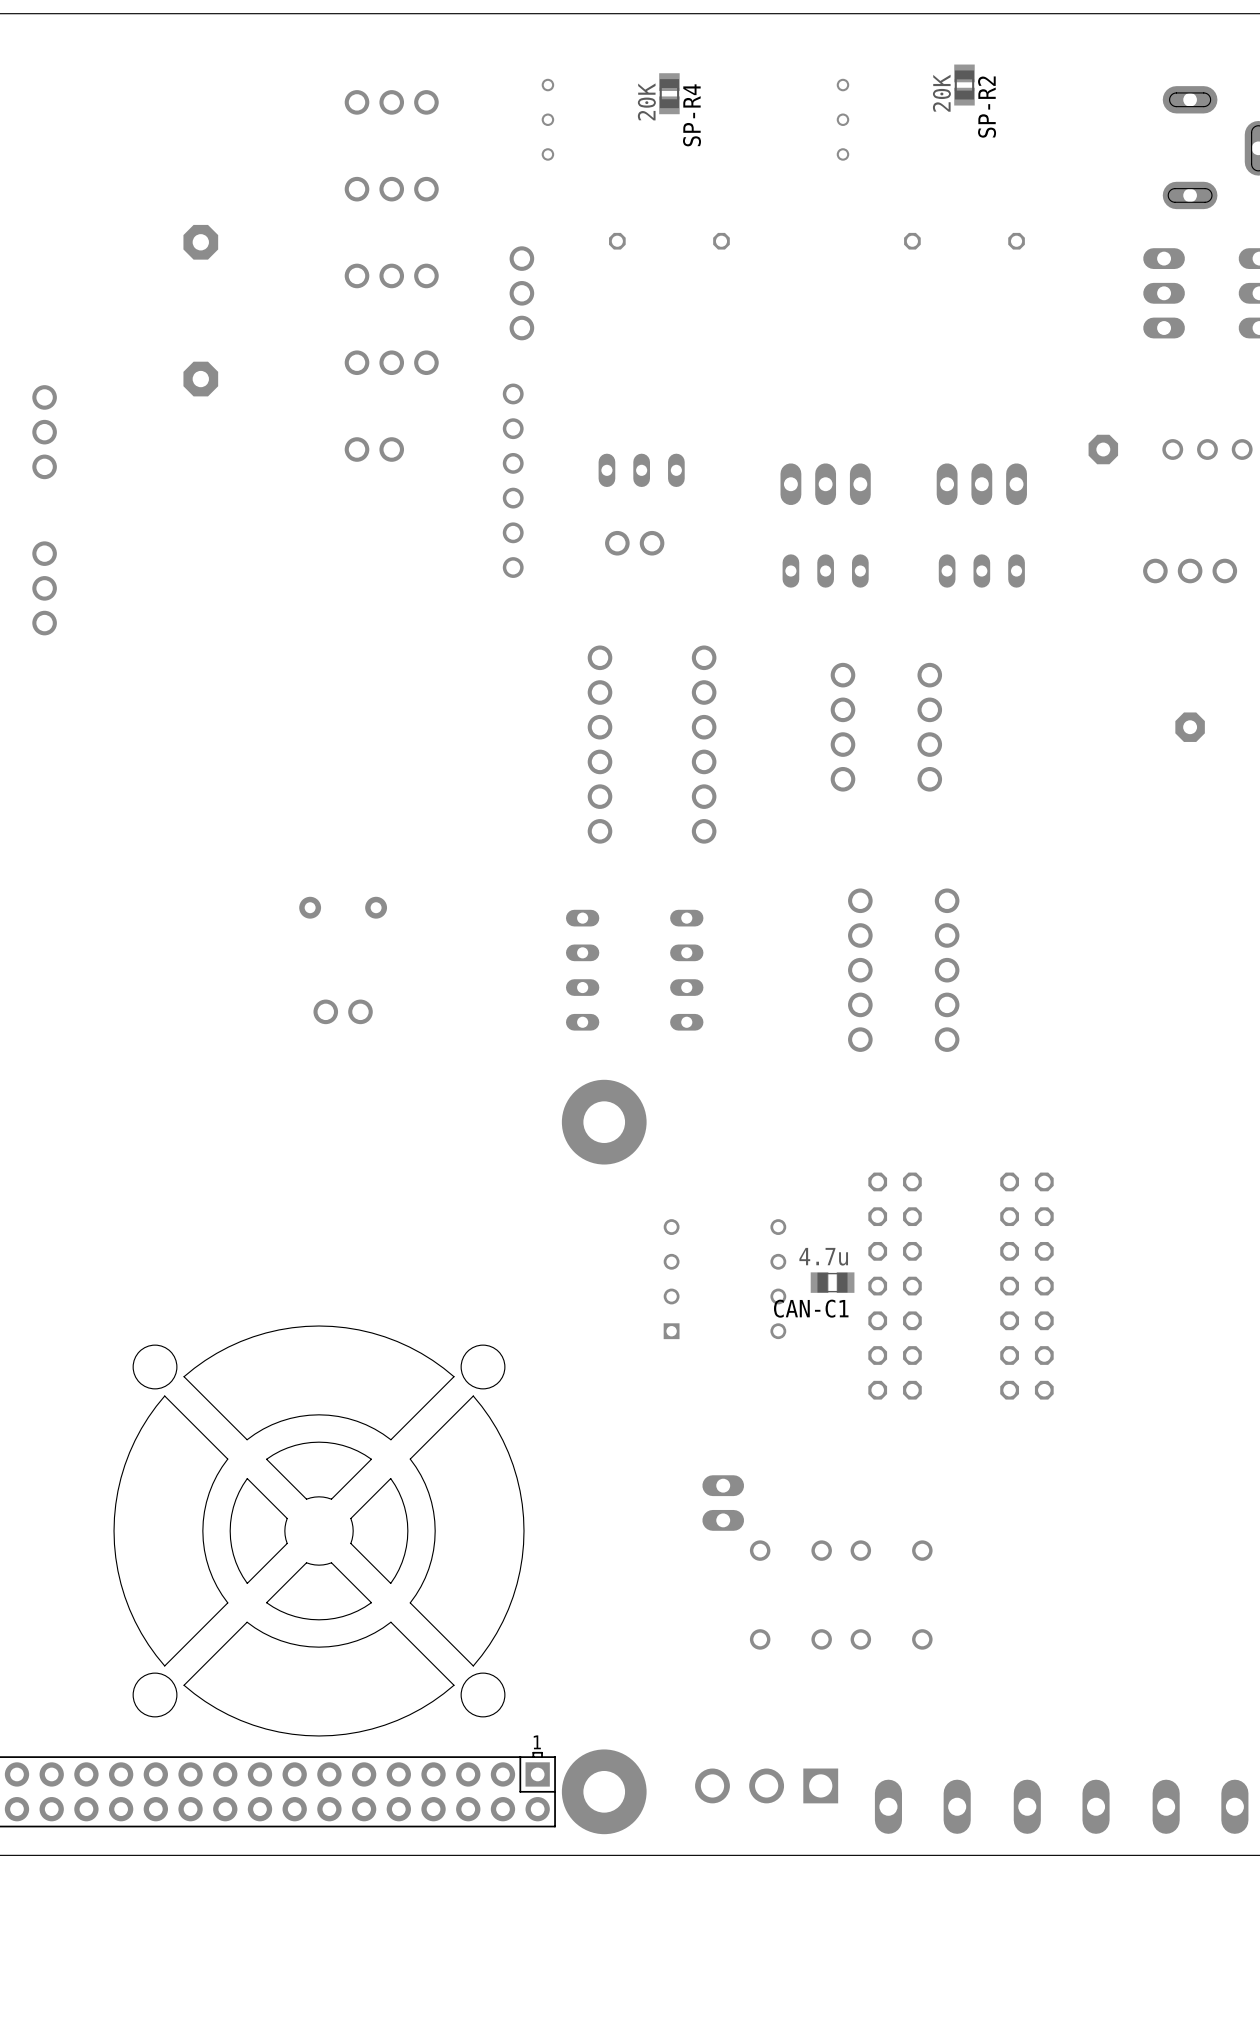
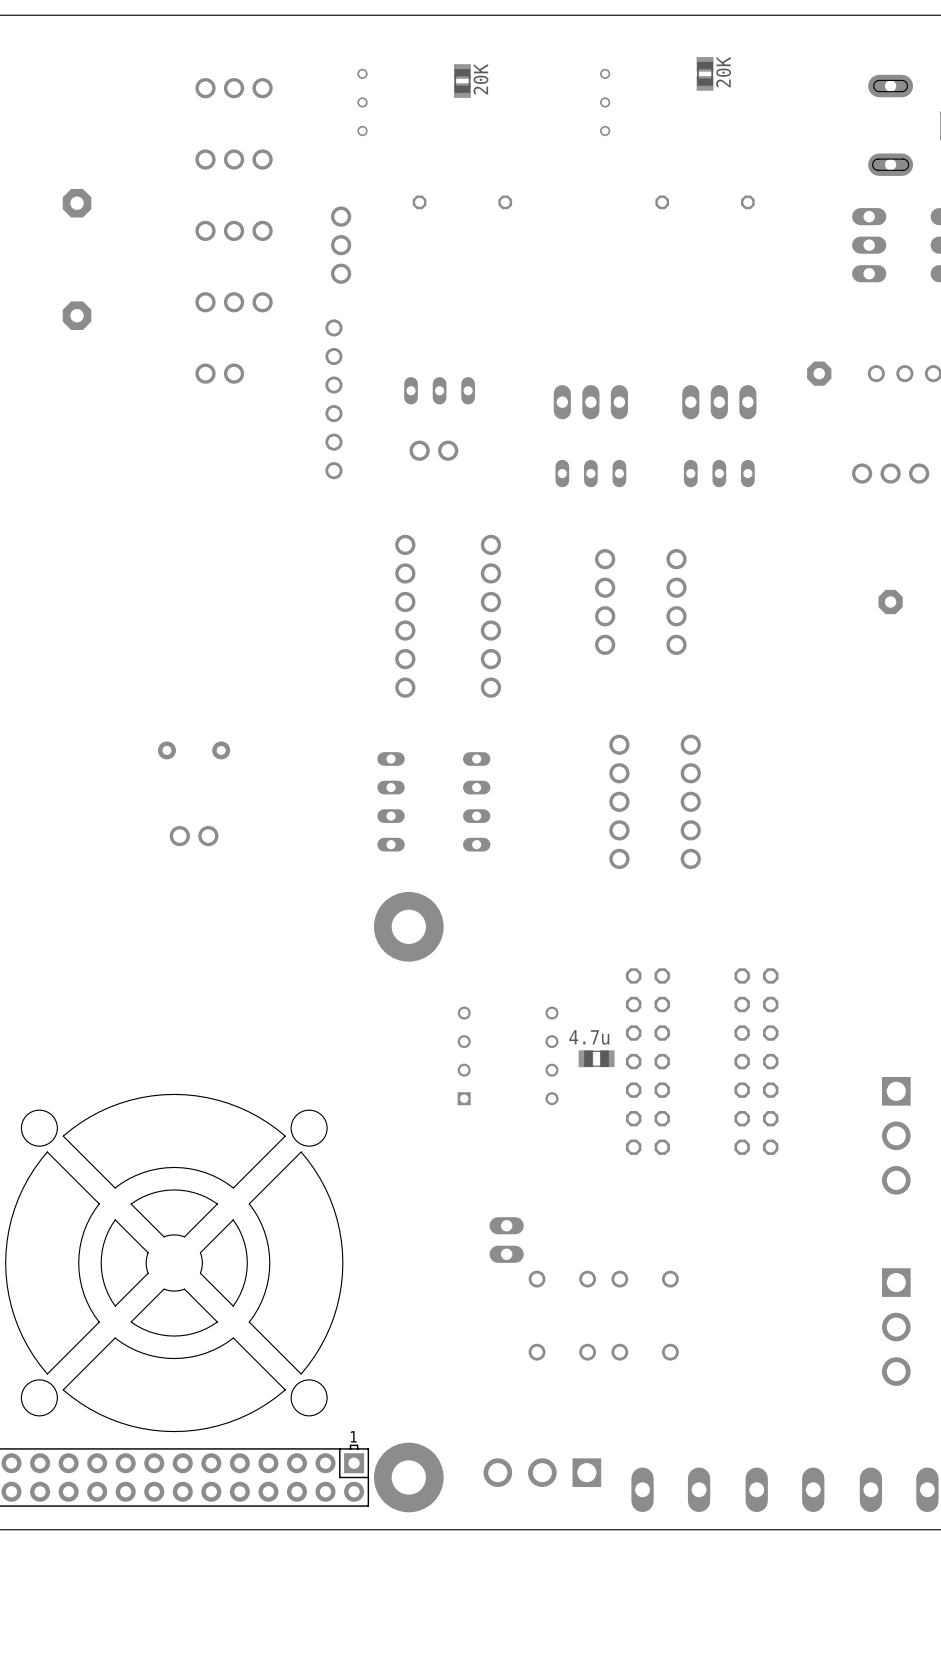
SP-R2 value position: 20K (941, 93) -> 20K (723, 72)
SP-R4 value position: 20K (646, 101) -> 20K (480, 79)
SP-R2 name: SP-R2 (987, 107) -> none
SP-R4 name: SP-R4 (692, 115) -> none
CAN-C1 name: CAN-C1 (811, 1308) -> none
part: none -> (896, 1135)
part: none -> (896, 1327)

